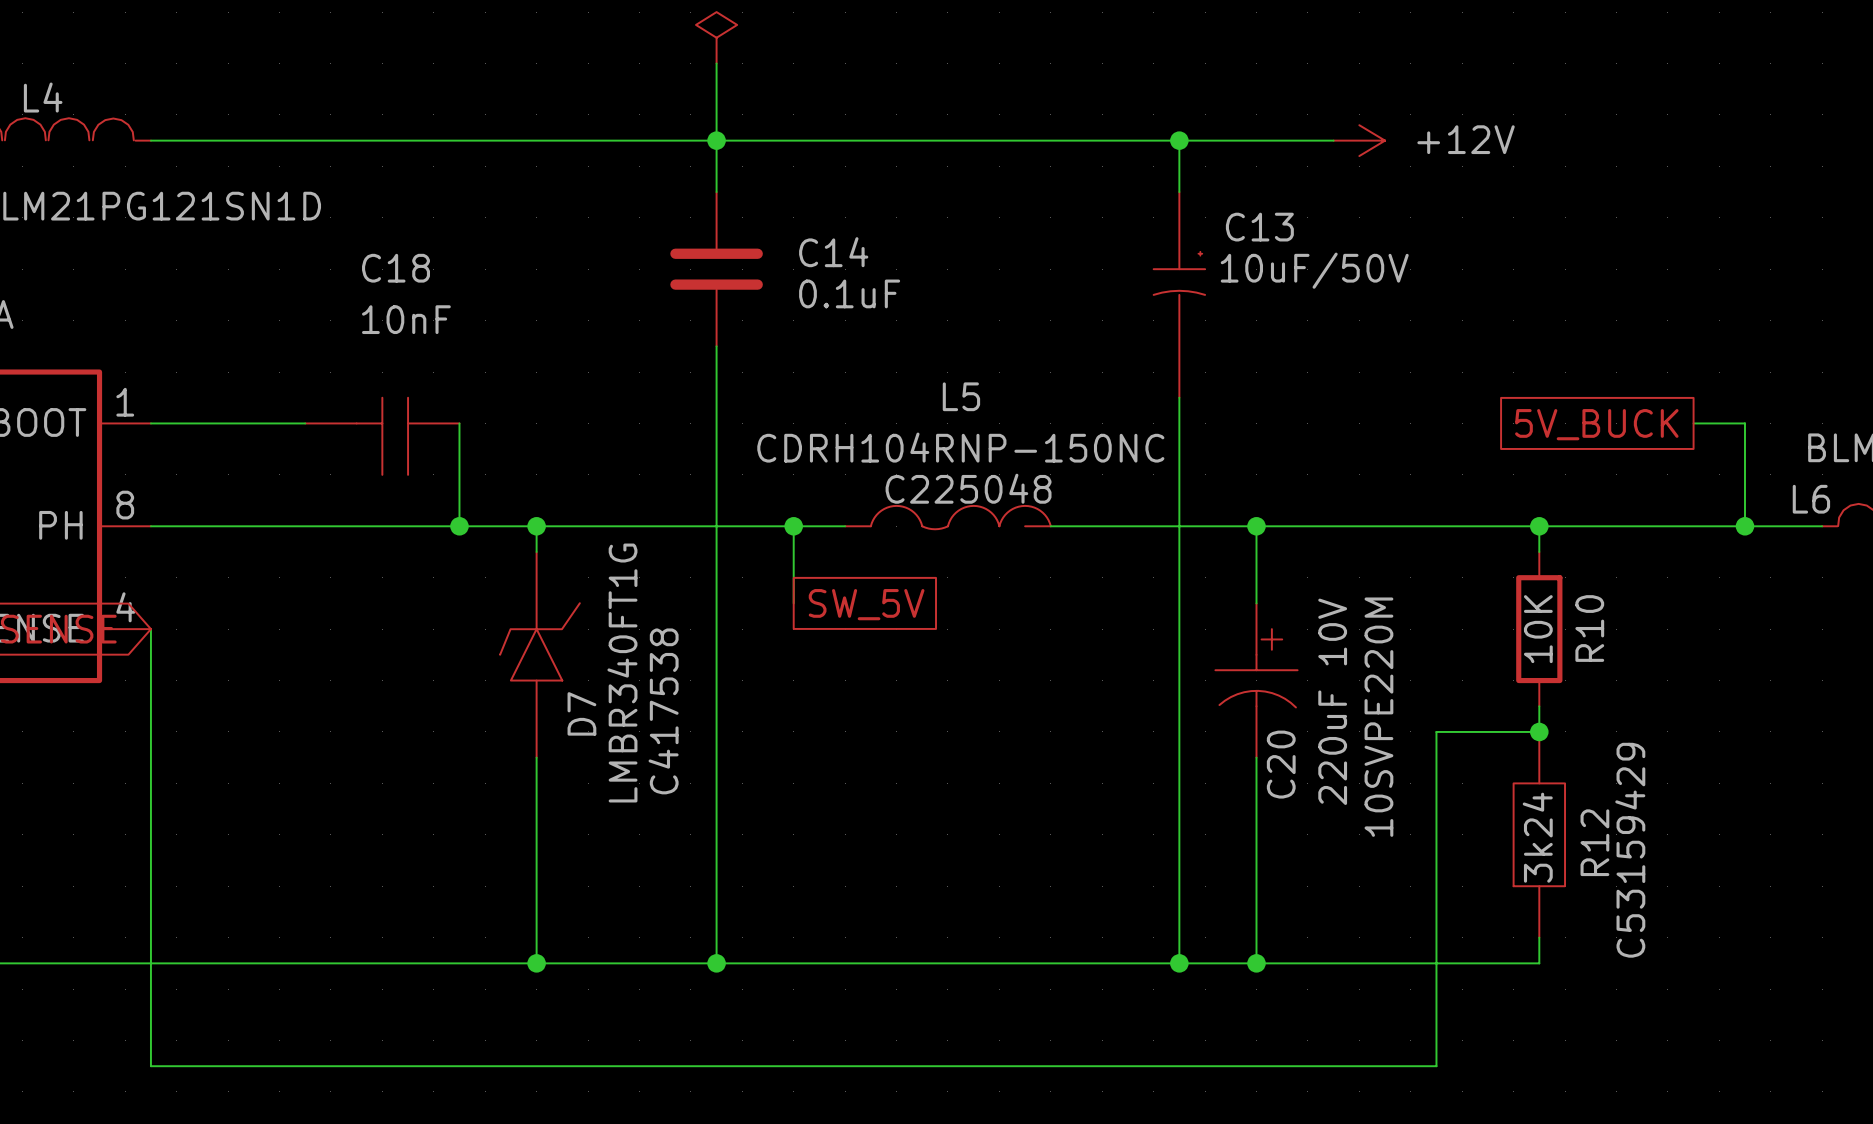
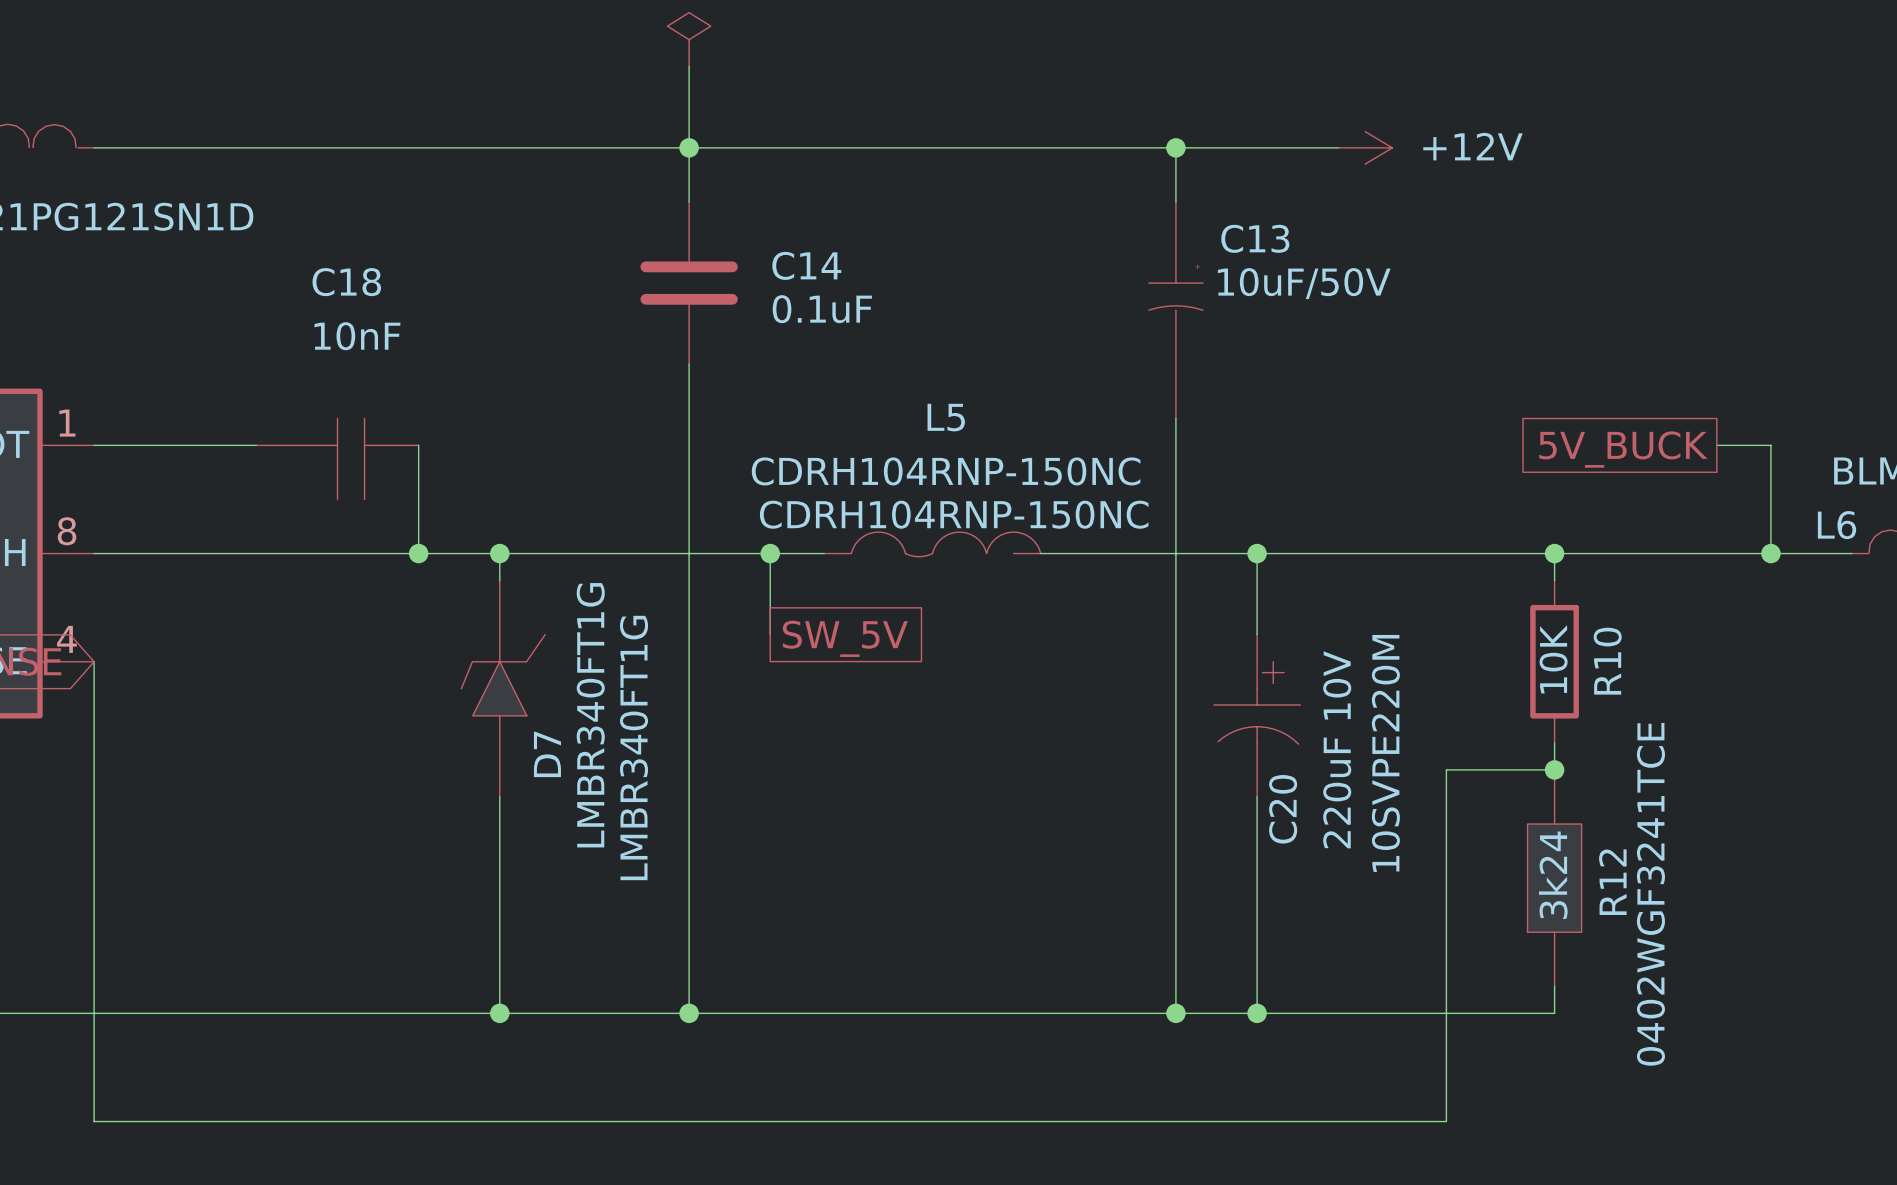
L5 text: C225048 (968, 488) -> CDRH104RNP-150NC (954, 514)
D7 text: C417538 (663, 711) -> LMBR340FT1G (634, 748)
R12 text: C53159429 (1630, 850) -> 0402WGF3241TCE (1650, 894)

